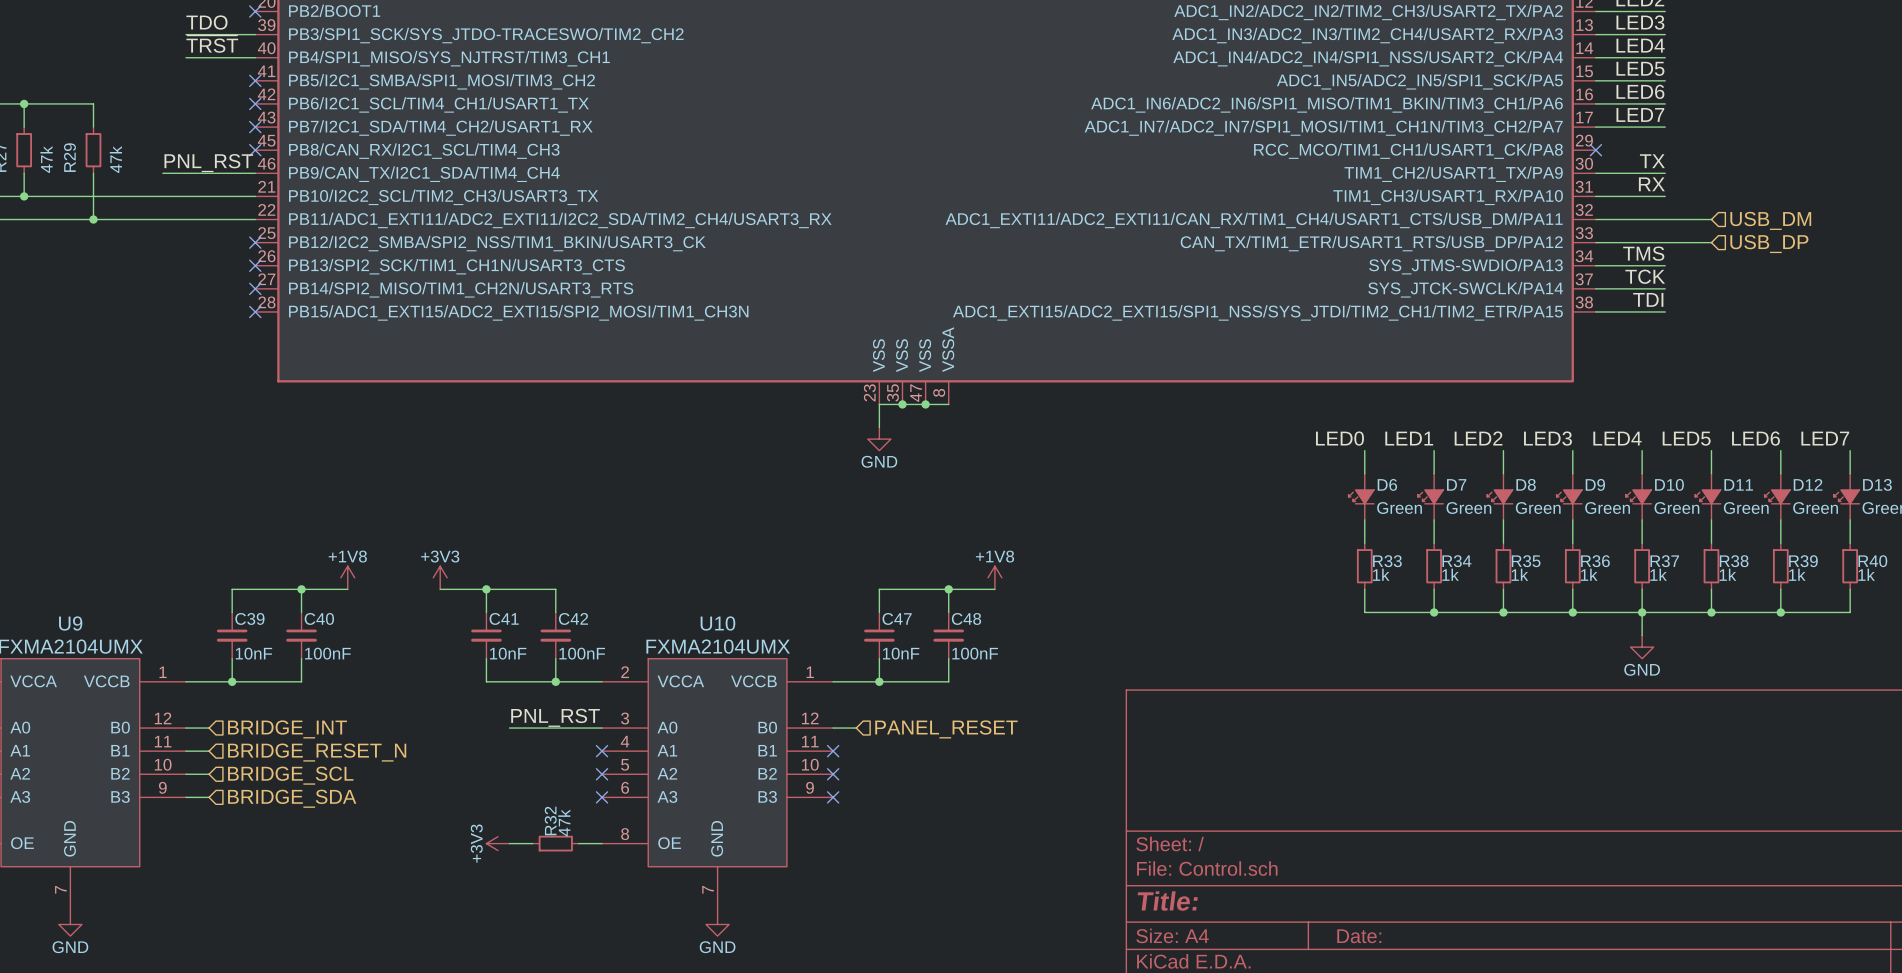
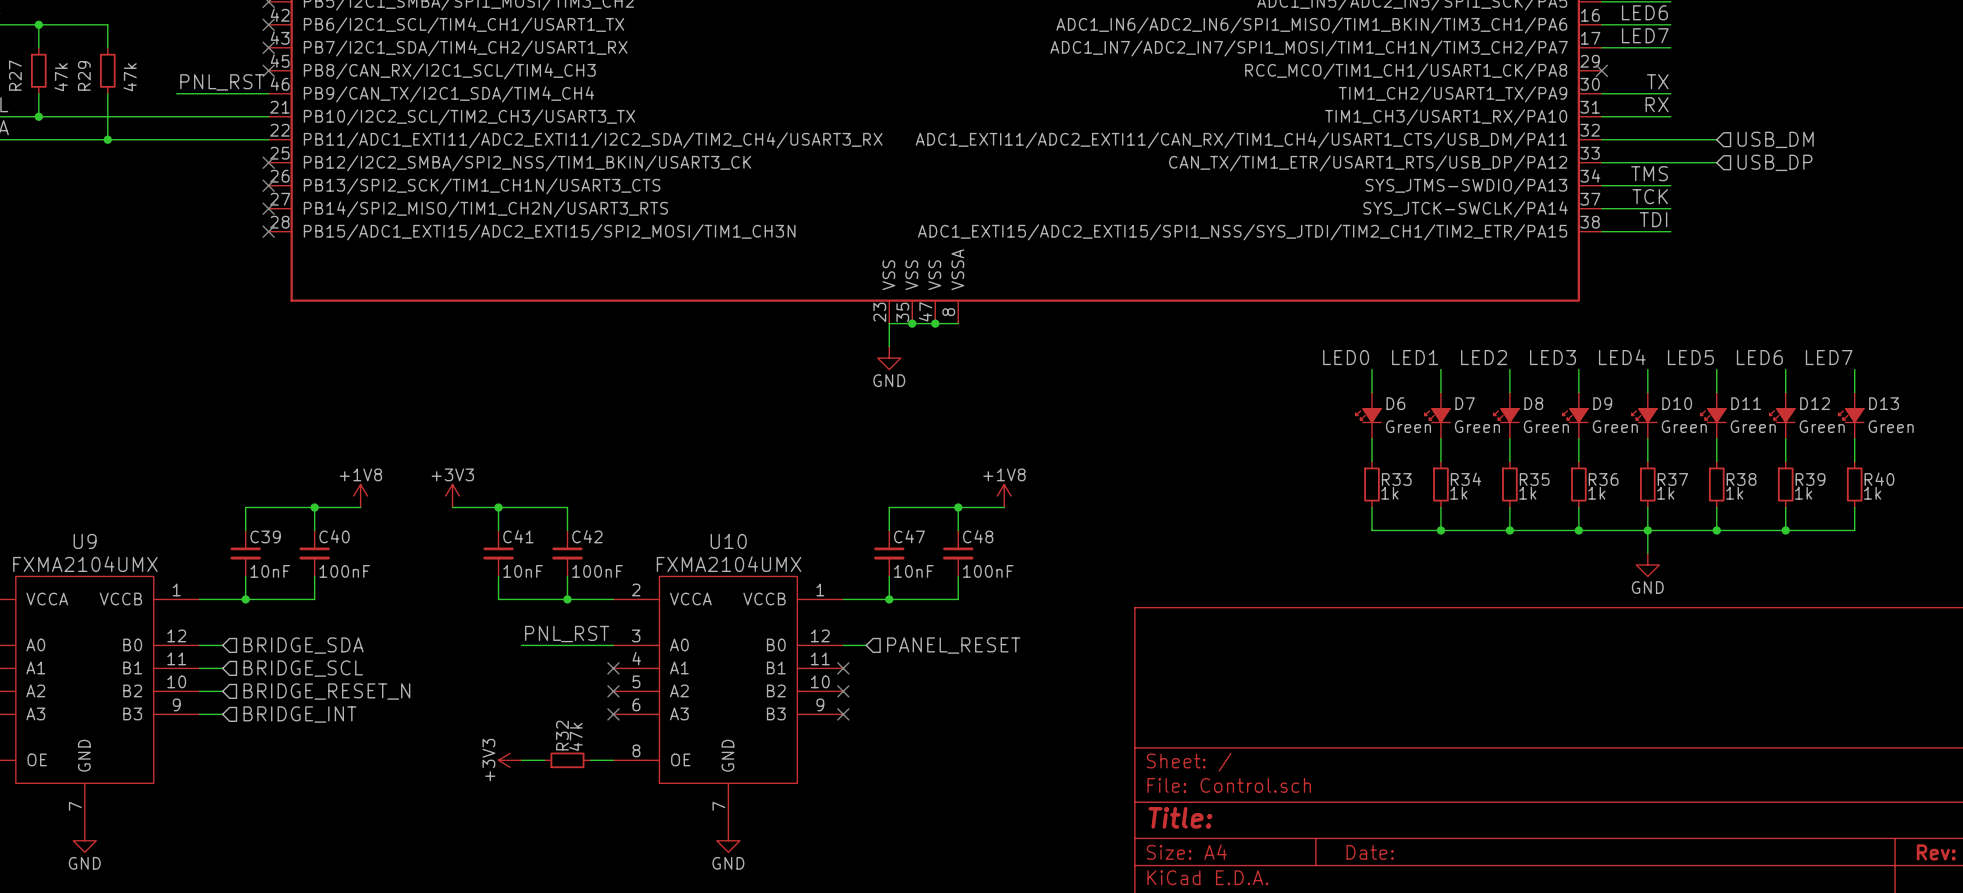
hierarchical label: BRIDGE_INT (287, 729) -> BRIDGE_SDA (303, 645)
hierarchical label: BRIDGE_RESET_N (317, 752) -> BRIDGE_SCL (303, 668)
hierarchical label: BRIDGE_SCL (290, 775) -> BRIDGE_RESET_N (326, 691)
hierarchical label: BRIDGE_SDA (292, 798) -> BRIDGE_INT (299, 714)

